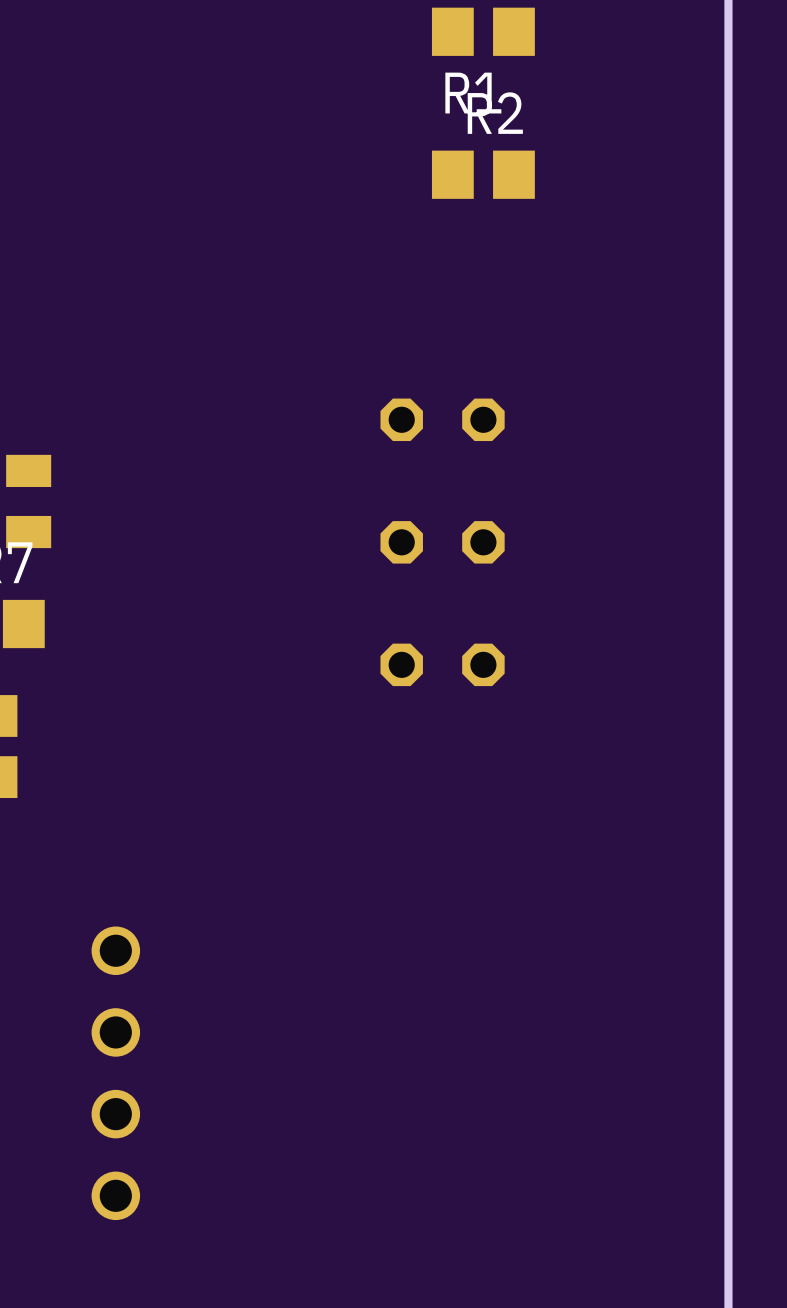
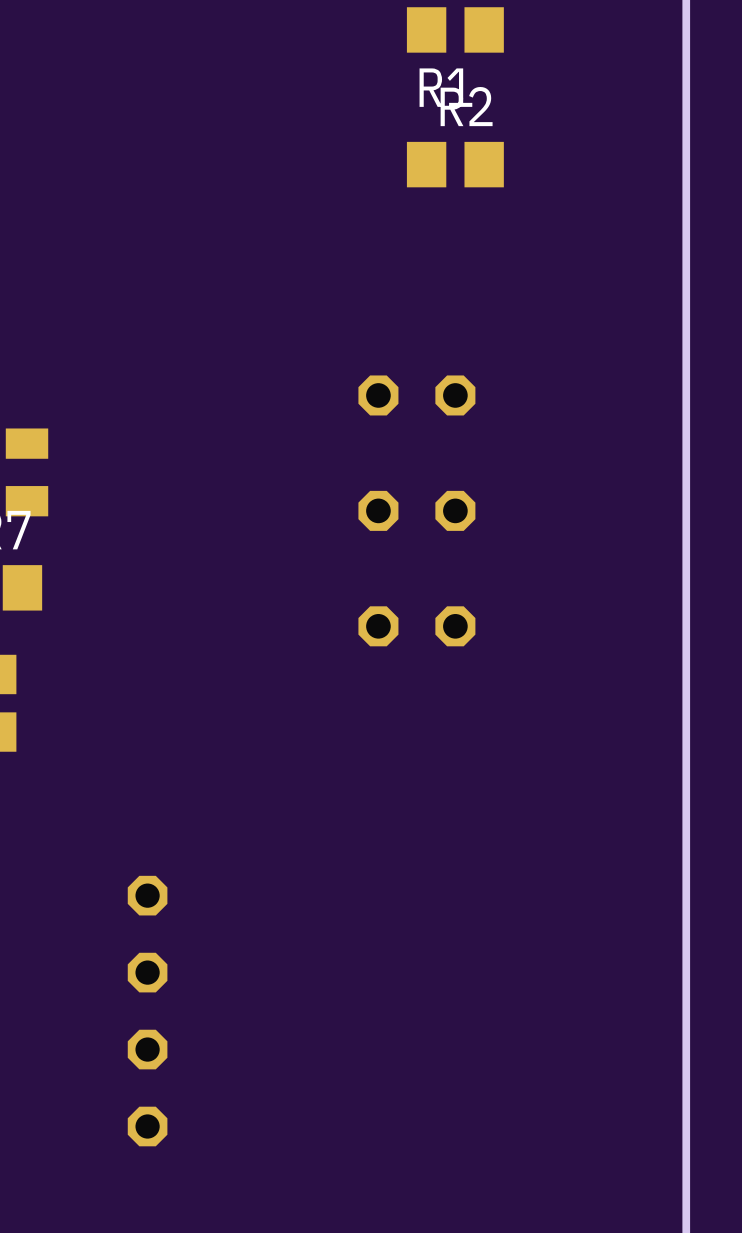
part: (115, 1073) -> none
part: none -> (147, 1011)

